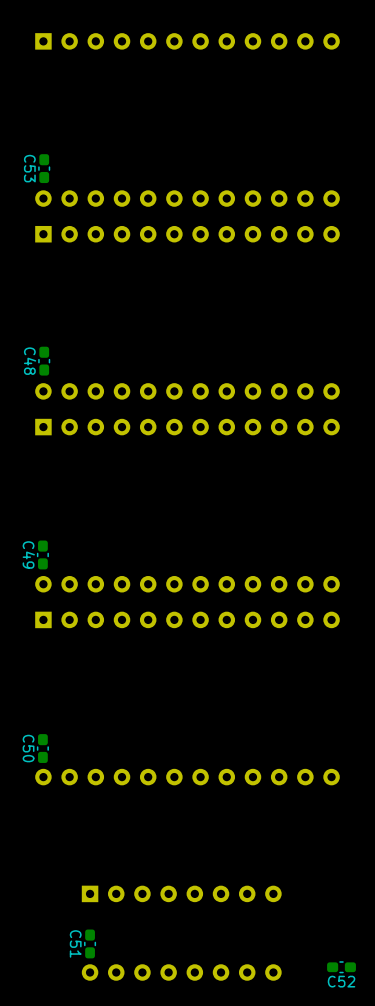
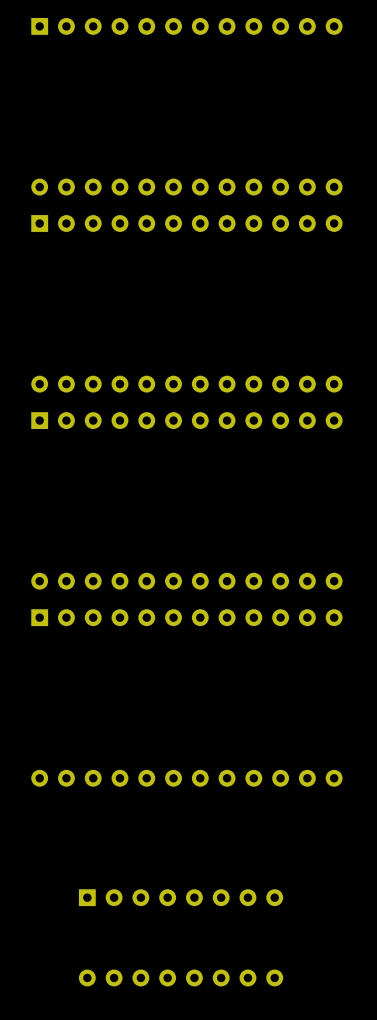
C53: (44, 168) -> none
C48: (44, 361) -> none
C49: (42, 554) -> none
C50: (42, 748) -> none
C51: (90, 943) -> none
C52: (341, 967) -> none

